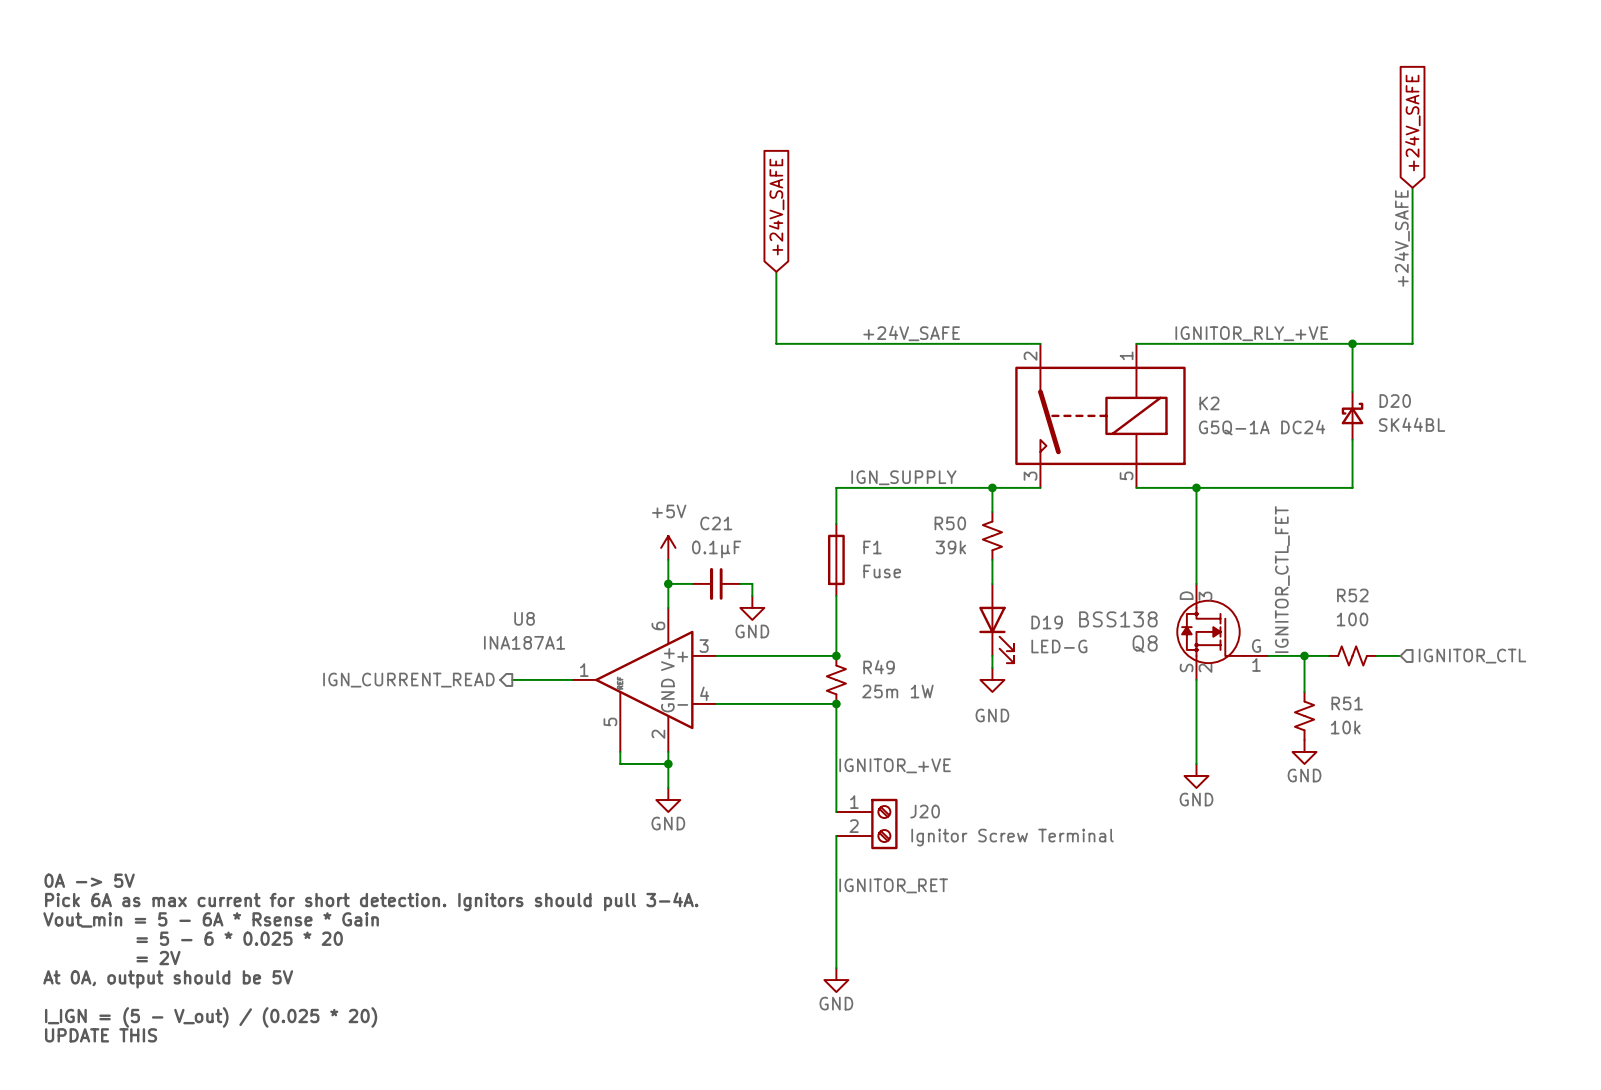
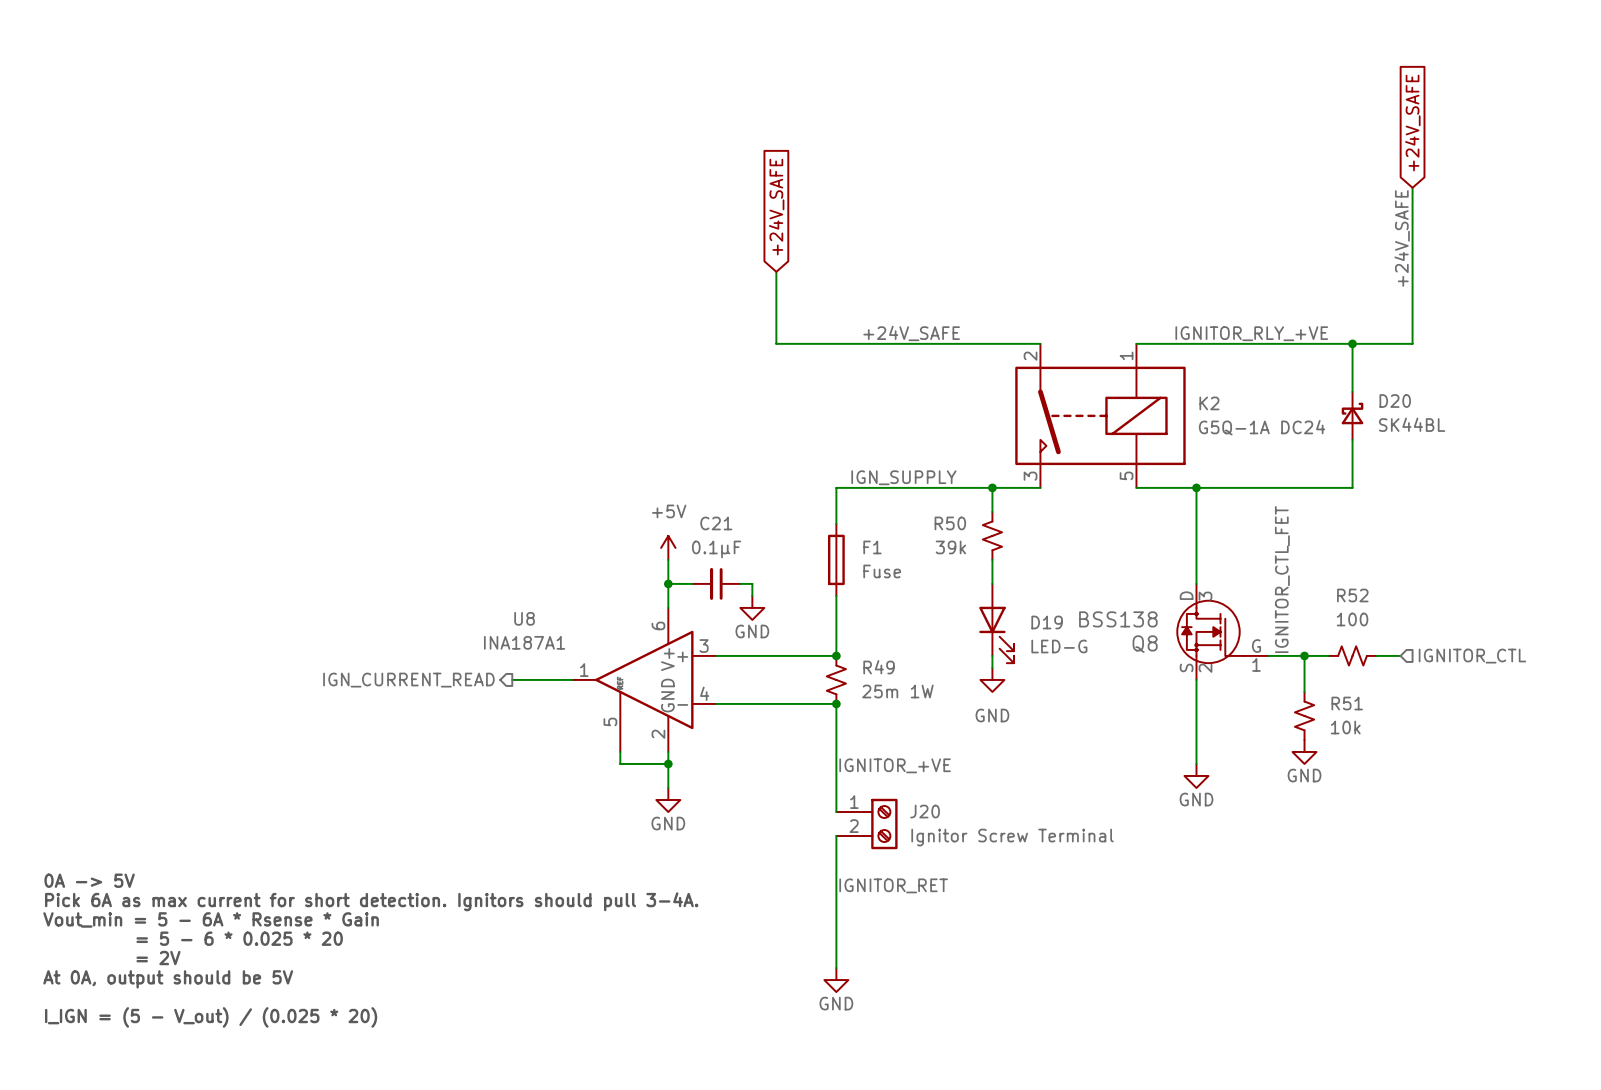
text: UPDATE THIS (101, 1035) -> none

